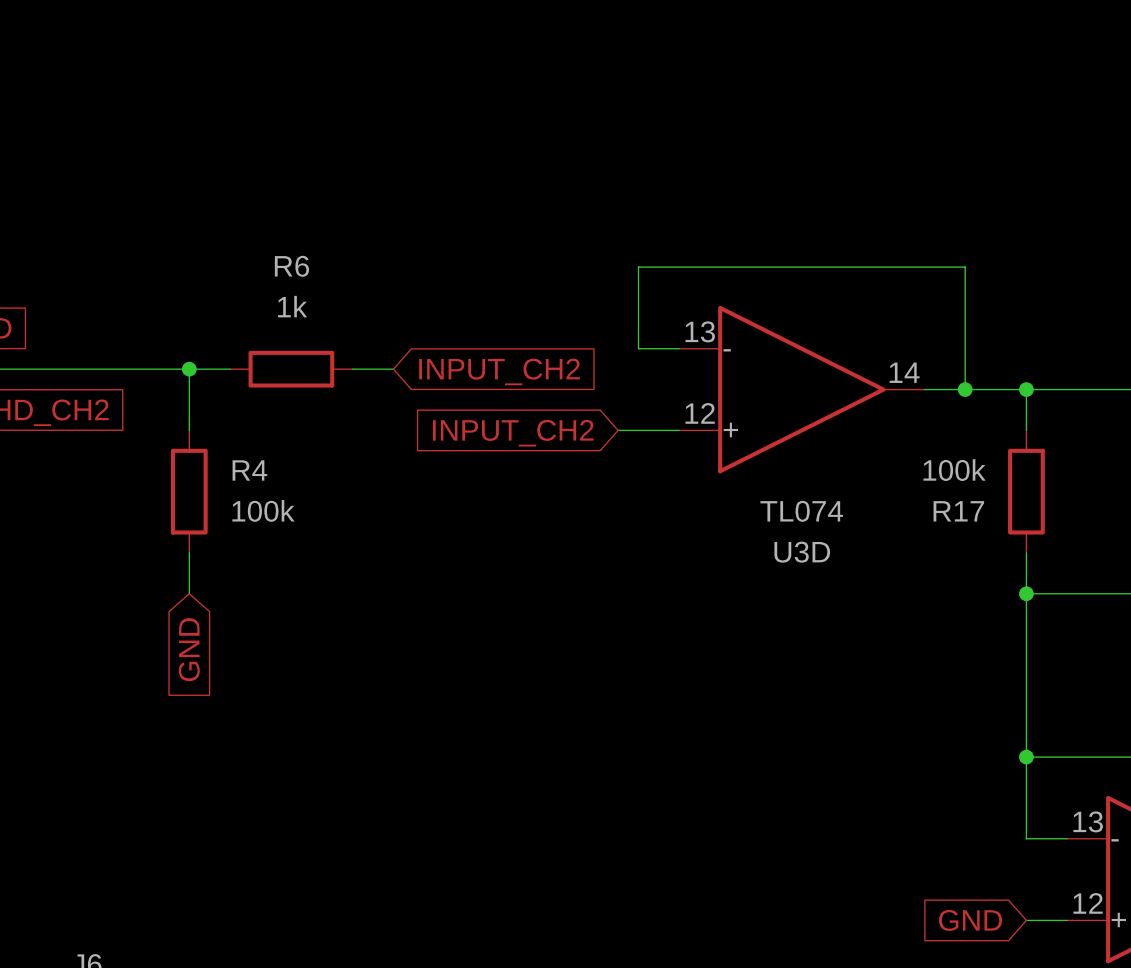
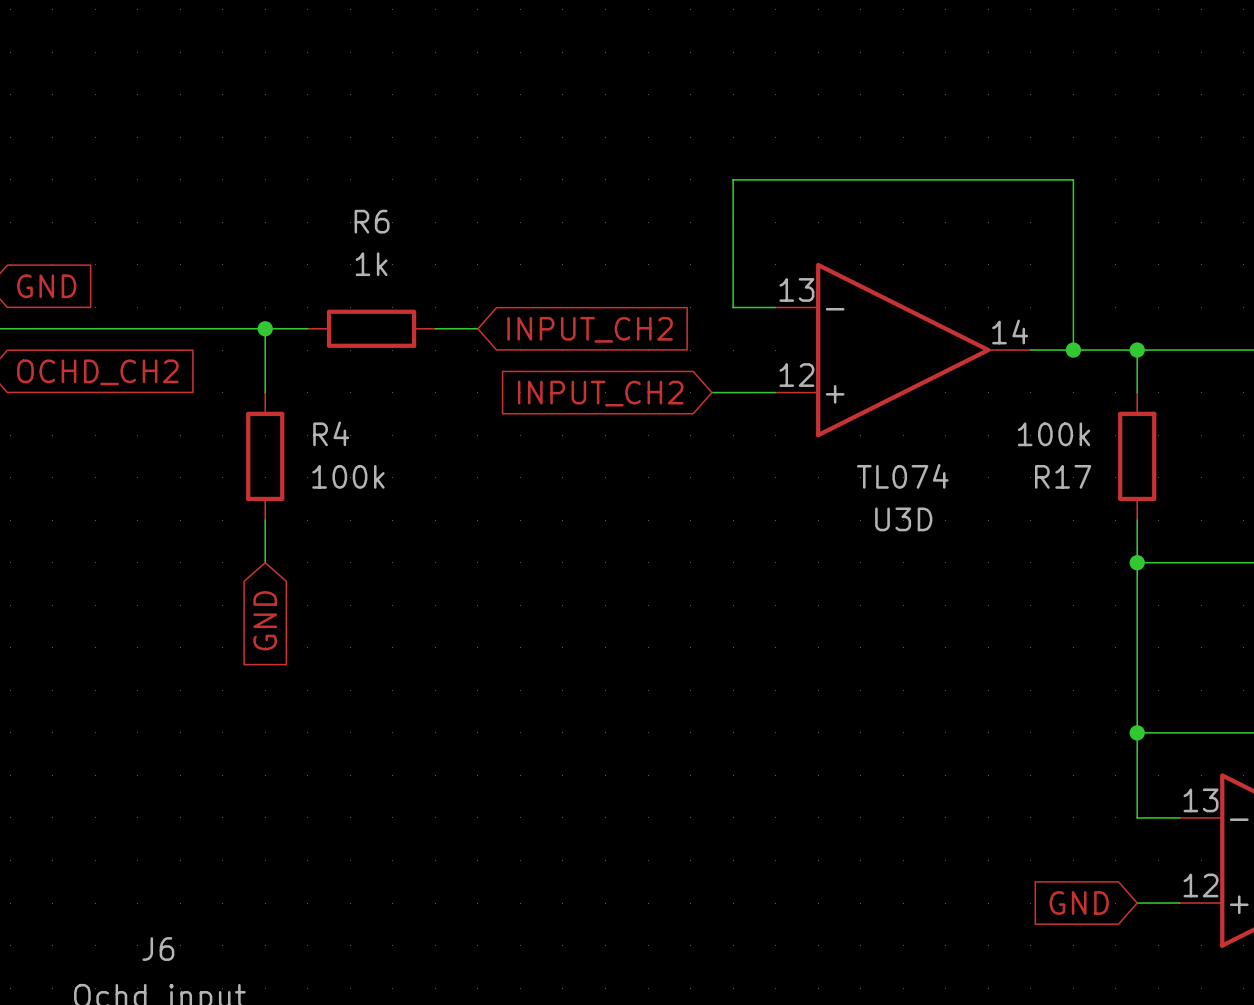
wire: (638, 267) (965, 267) -> (733, 222) (733, 179) (1073, 179) (1073, 222)

